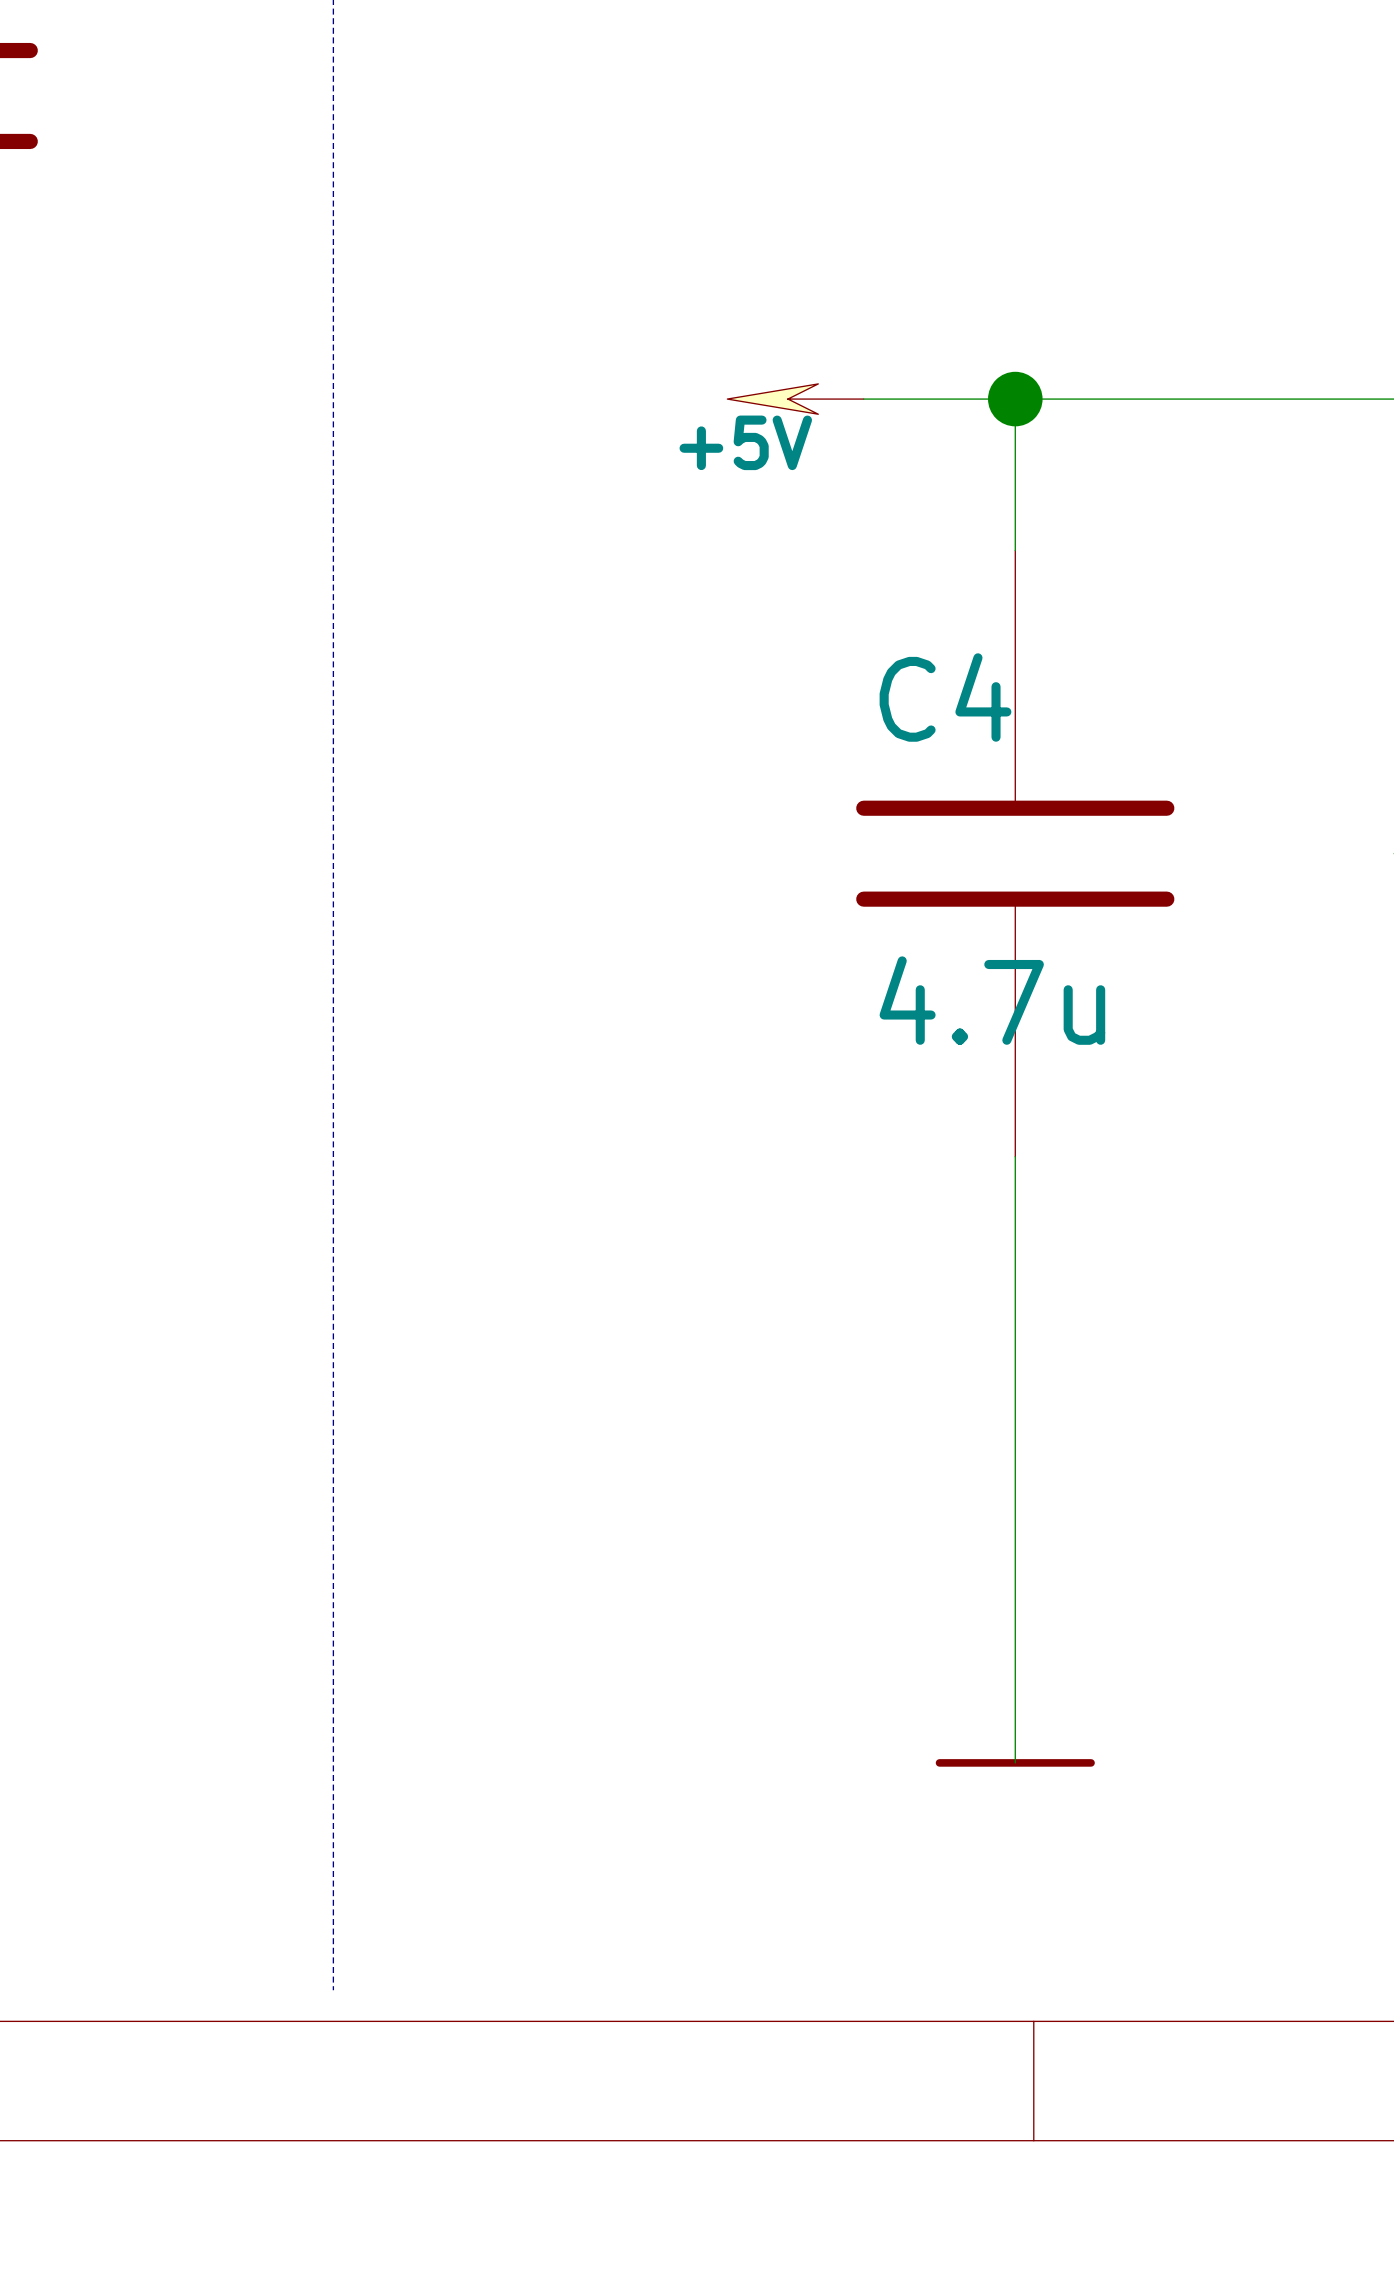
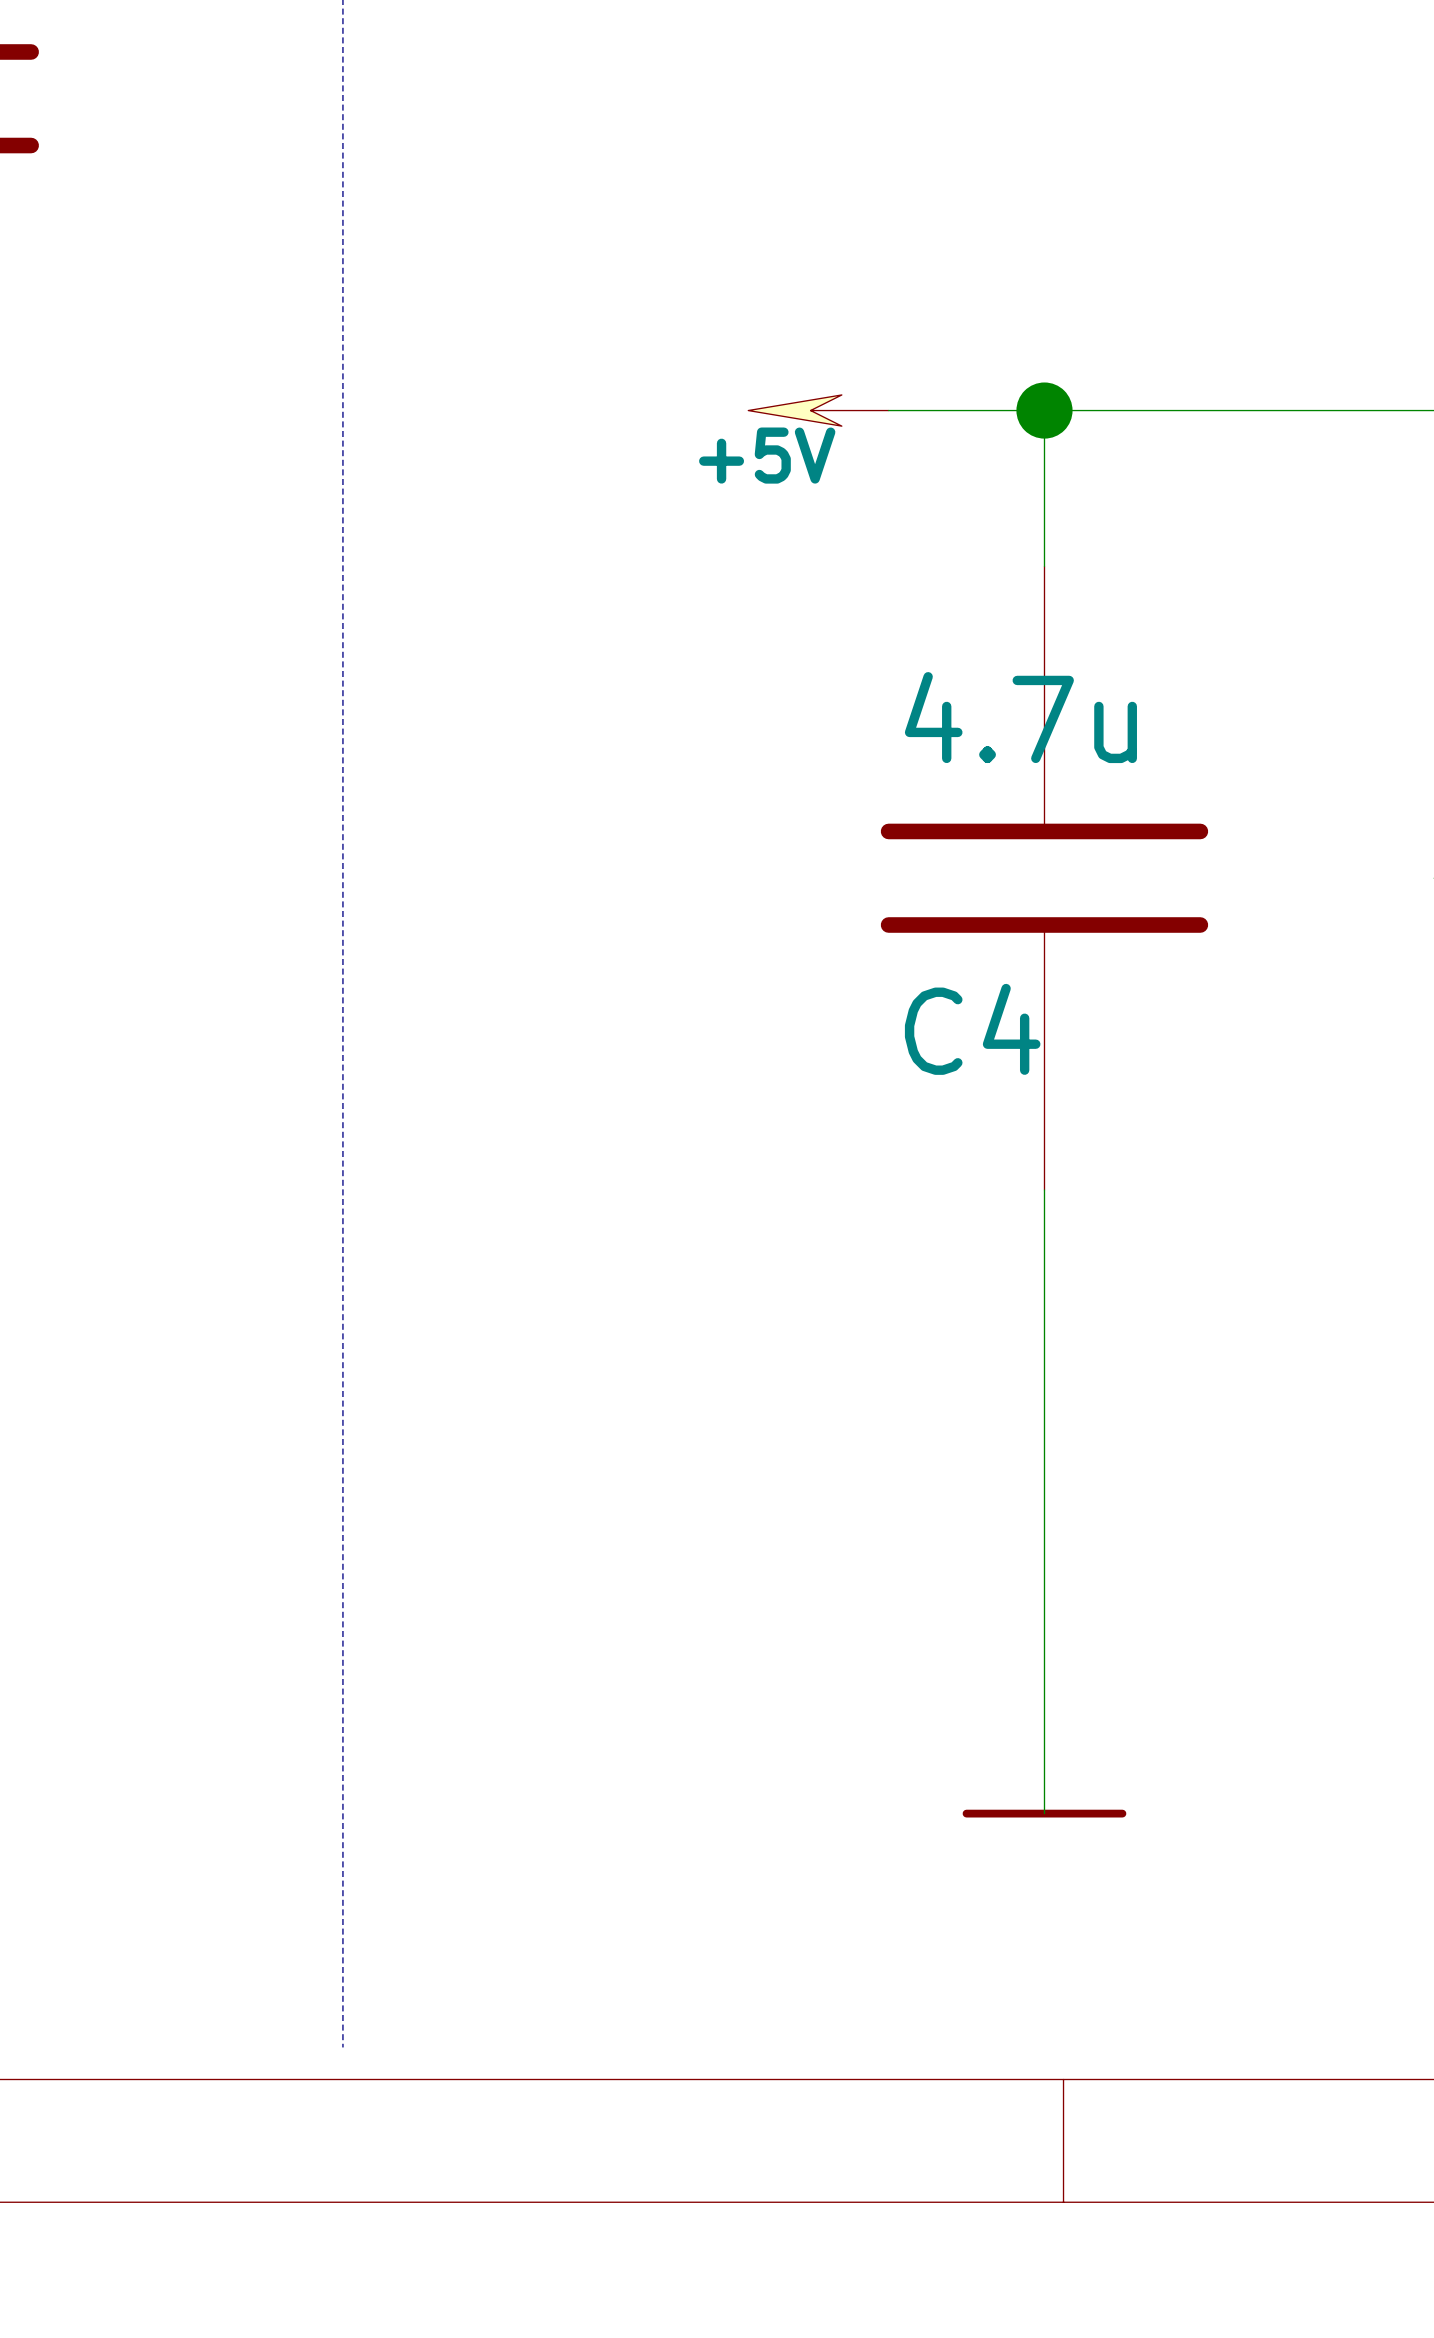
C4 name position: C4 (945, 697) -> C4 (972, 1029)
C4 value position: 4.7u (992, 1000) -> 4.7u (1020, 717)

